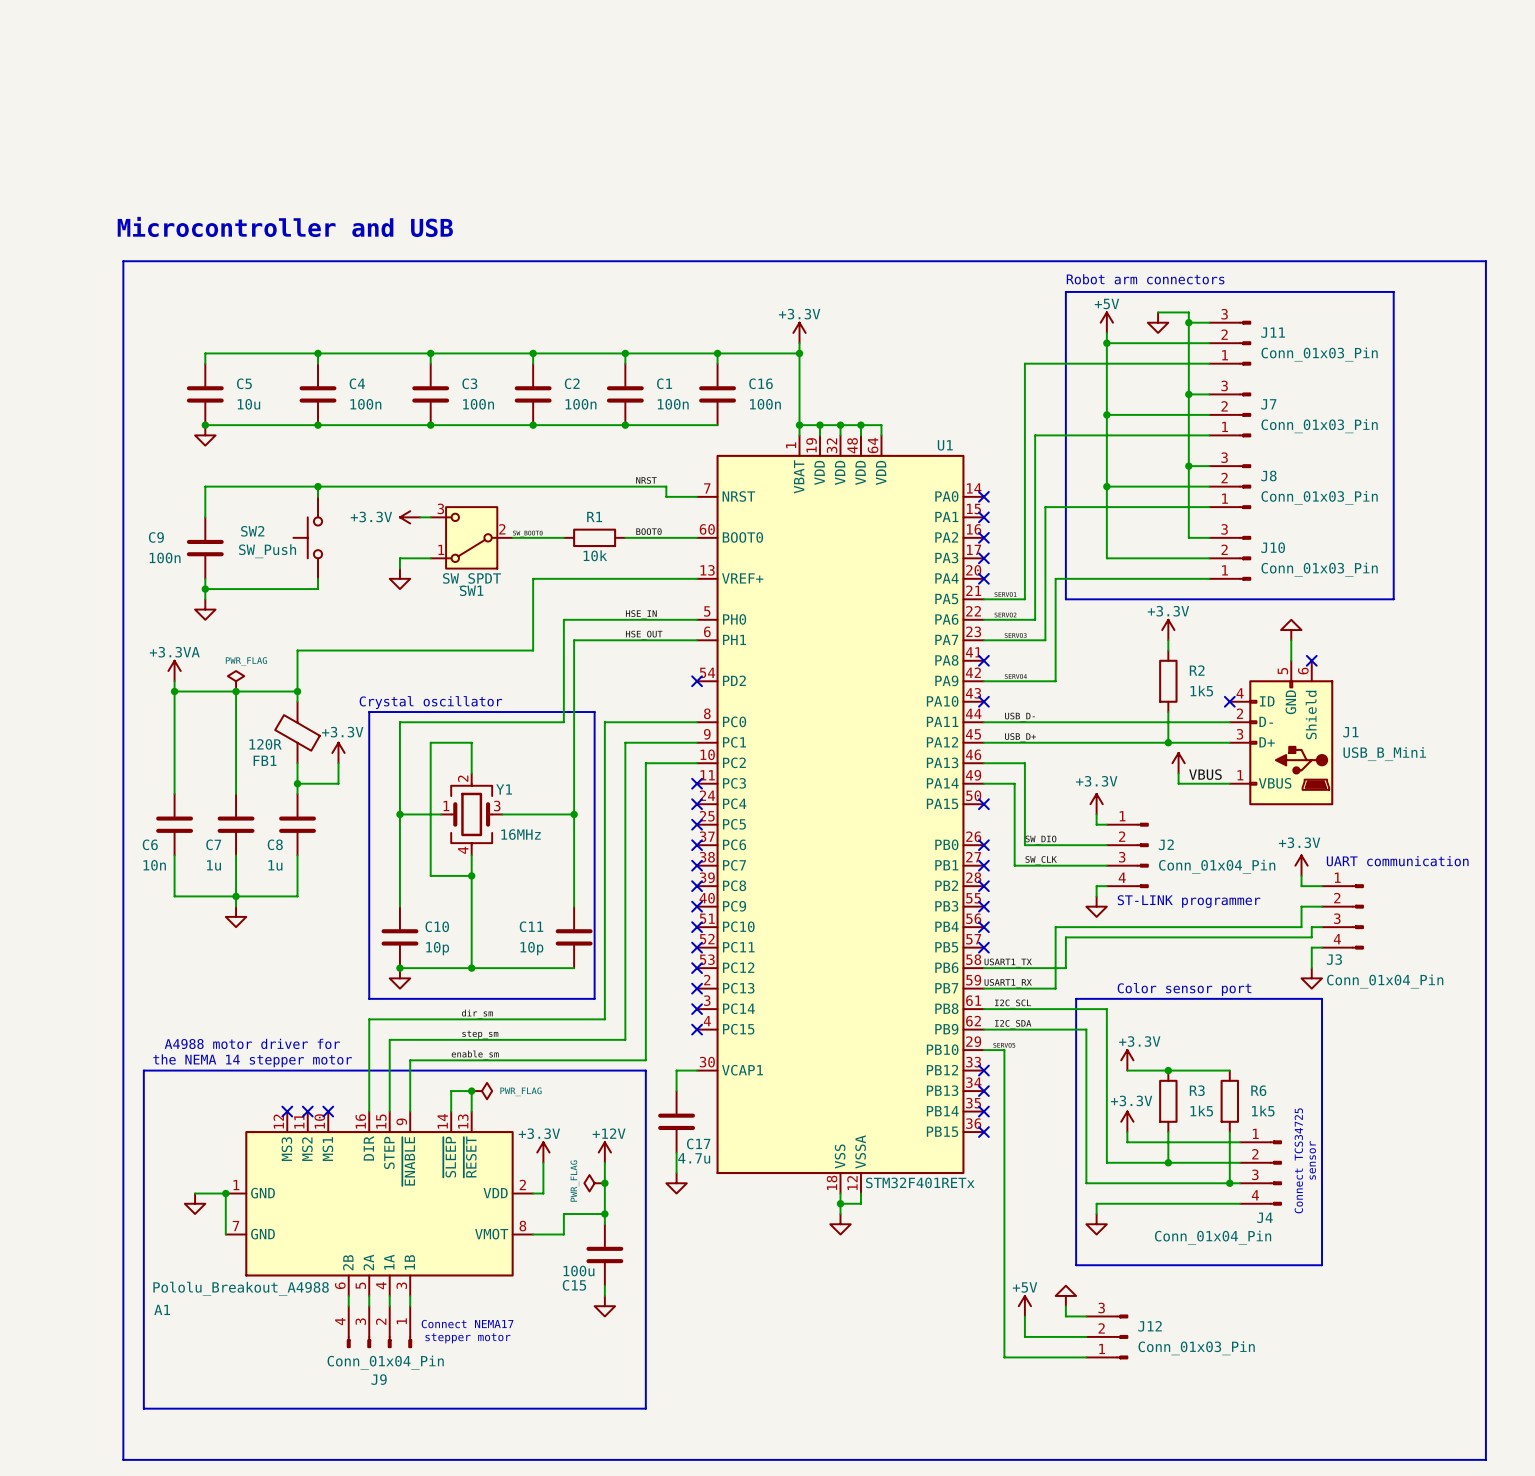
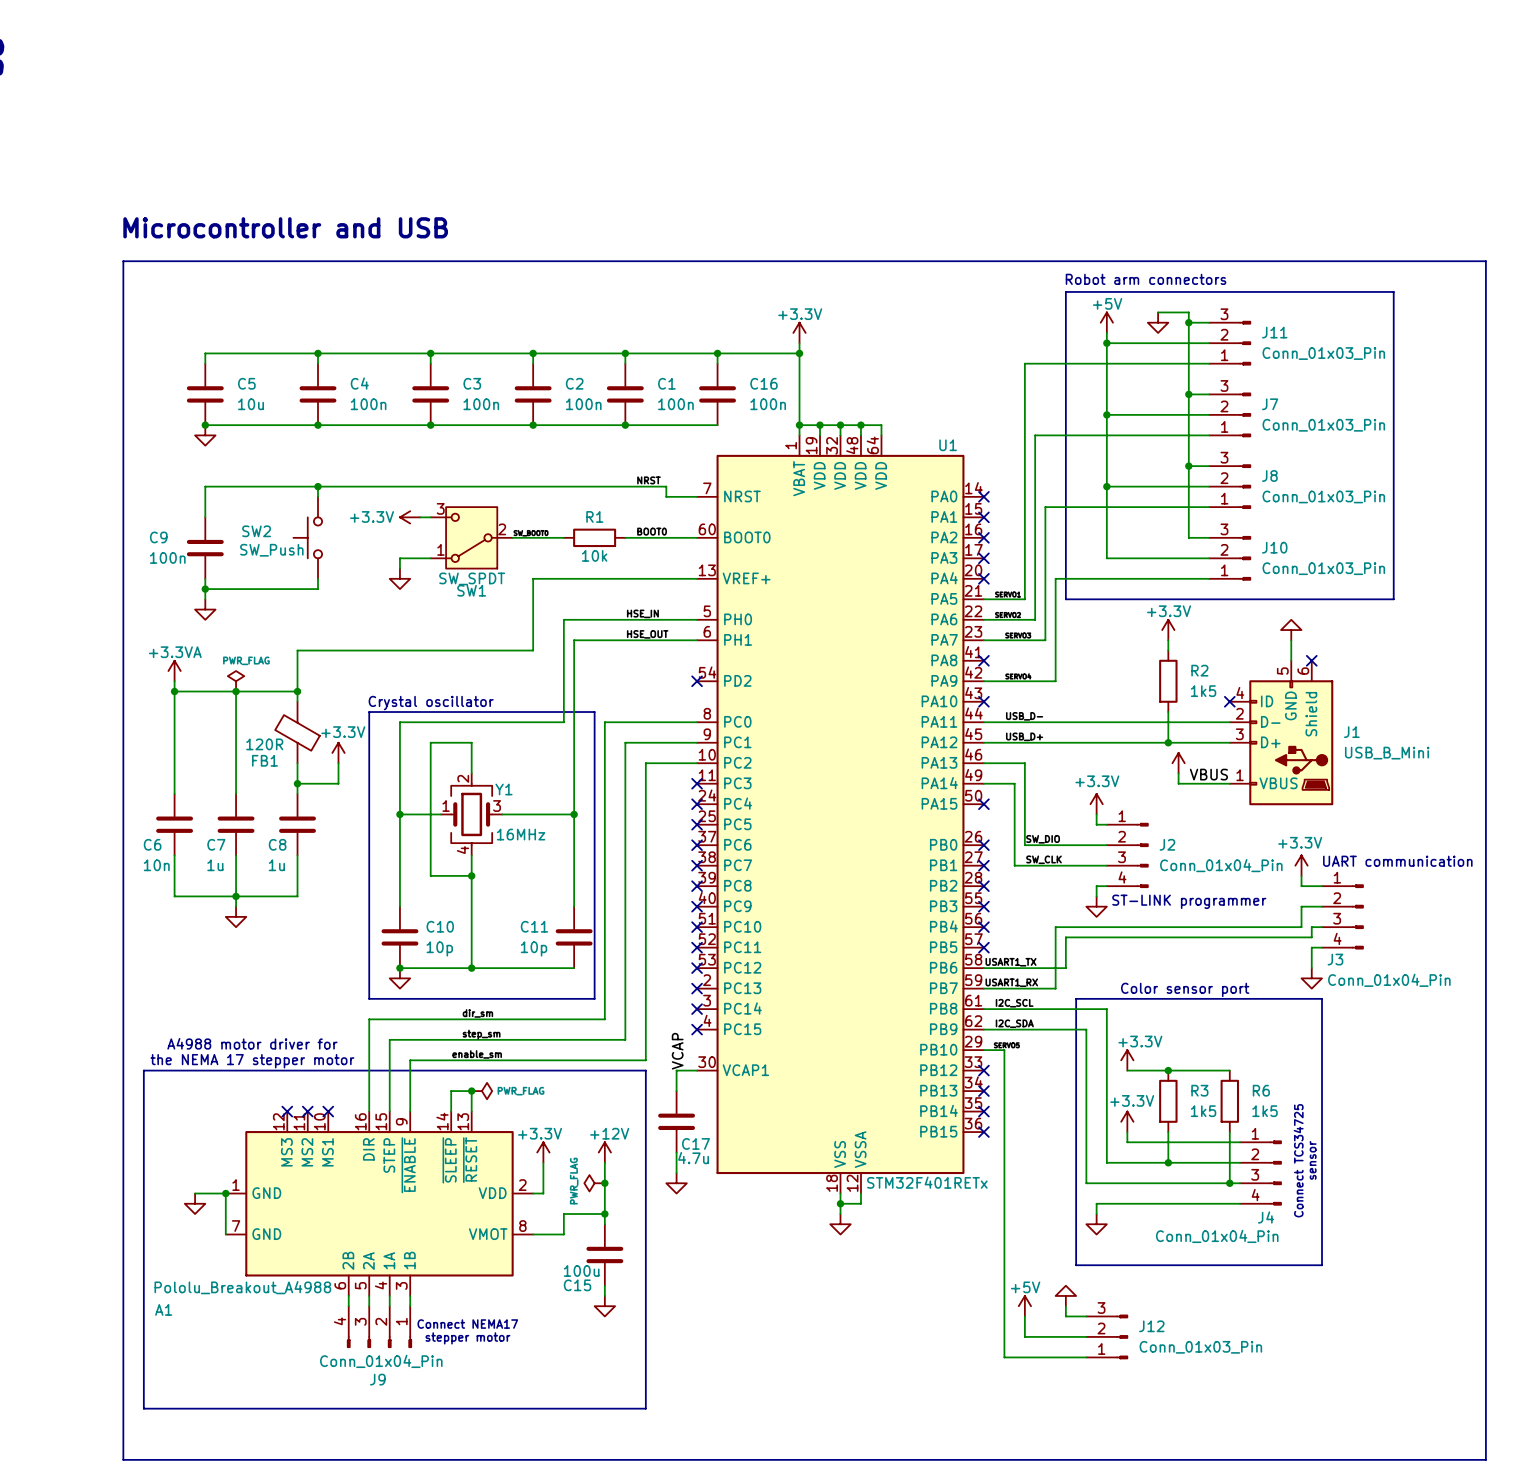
label: none -> VCAP (677, 1051)
text: the NEMA 14 stepper motor (252, 1060) -> the NEMA 17 stepper motor (252, 1061)

